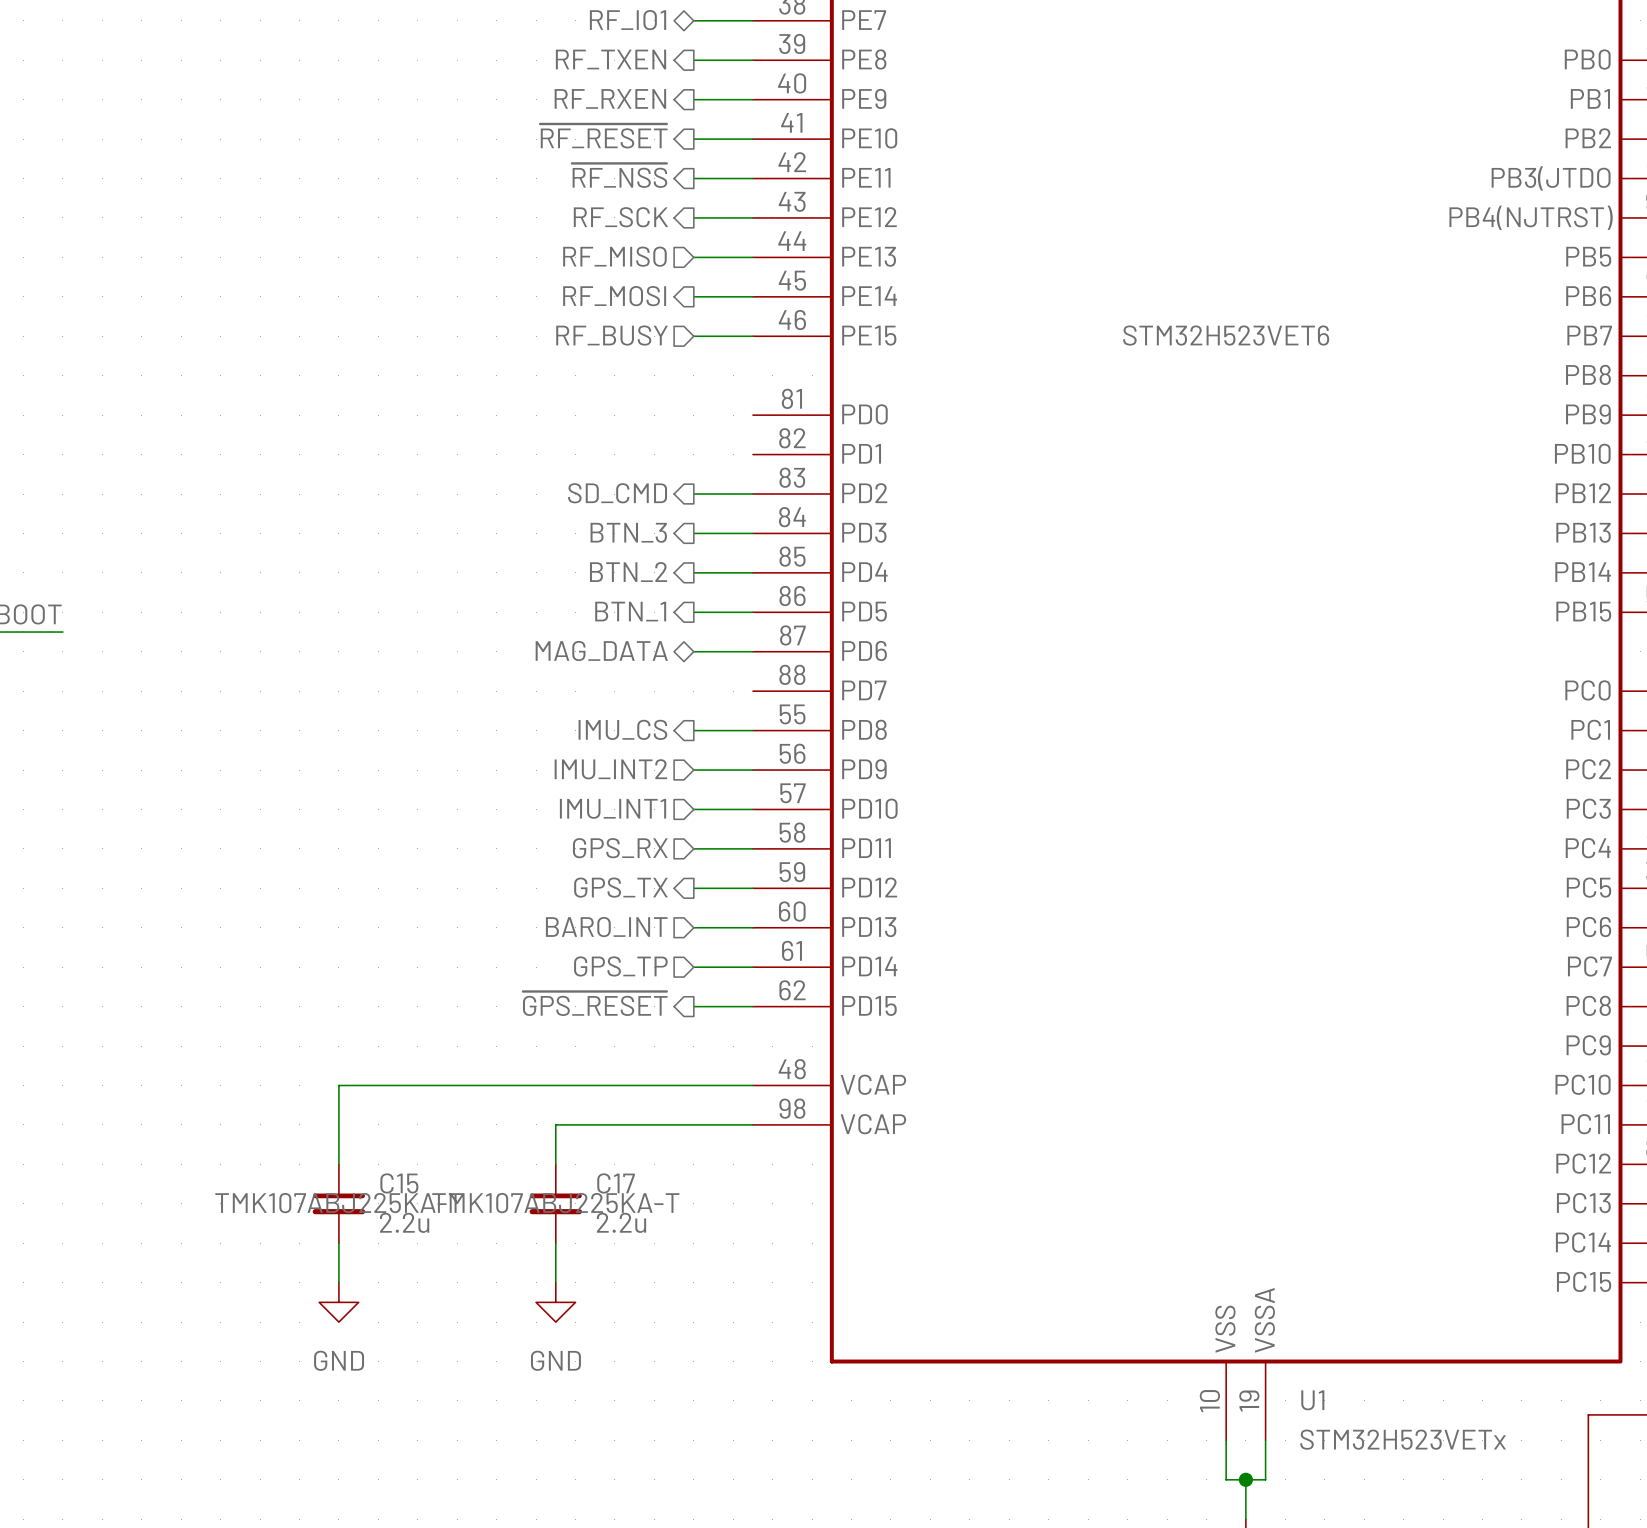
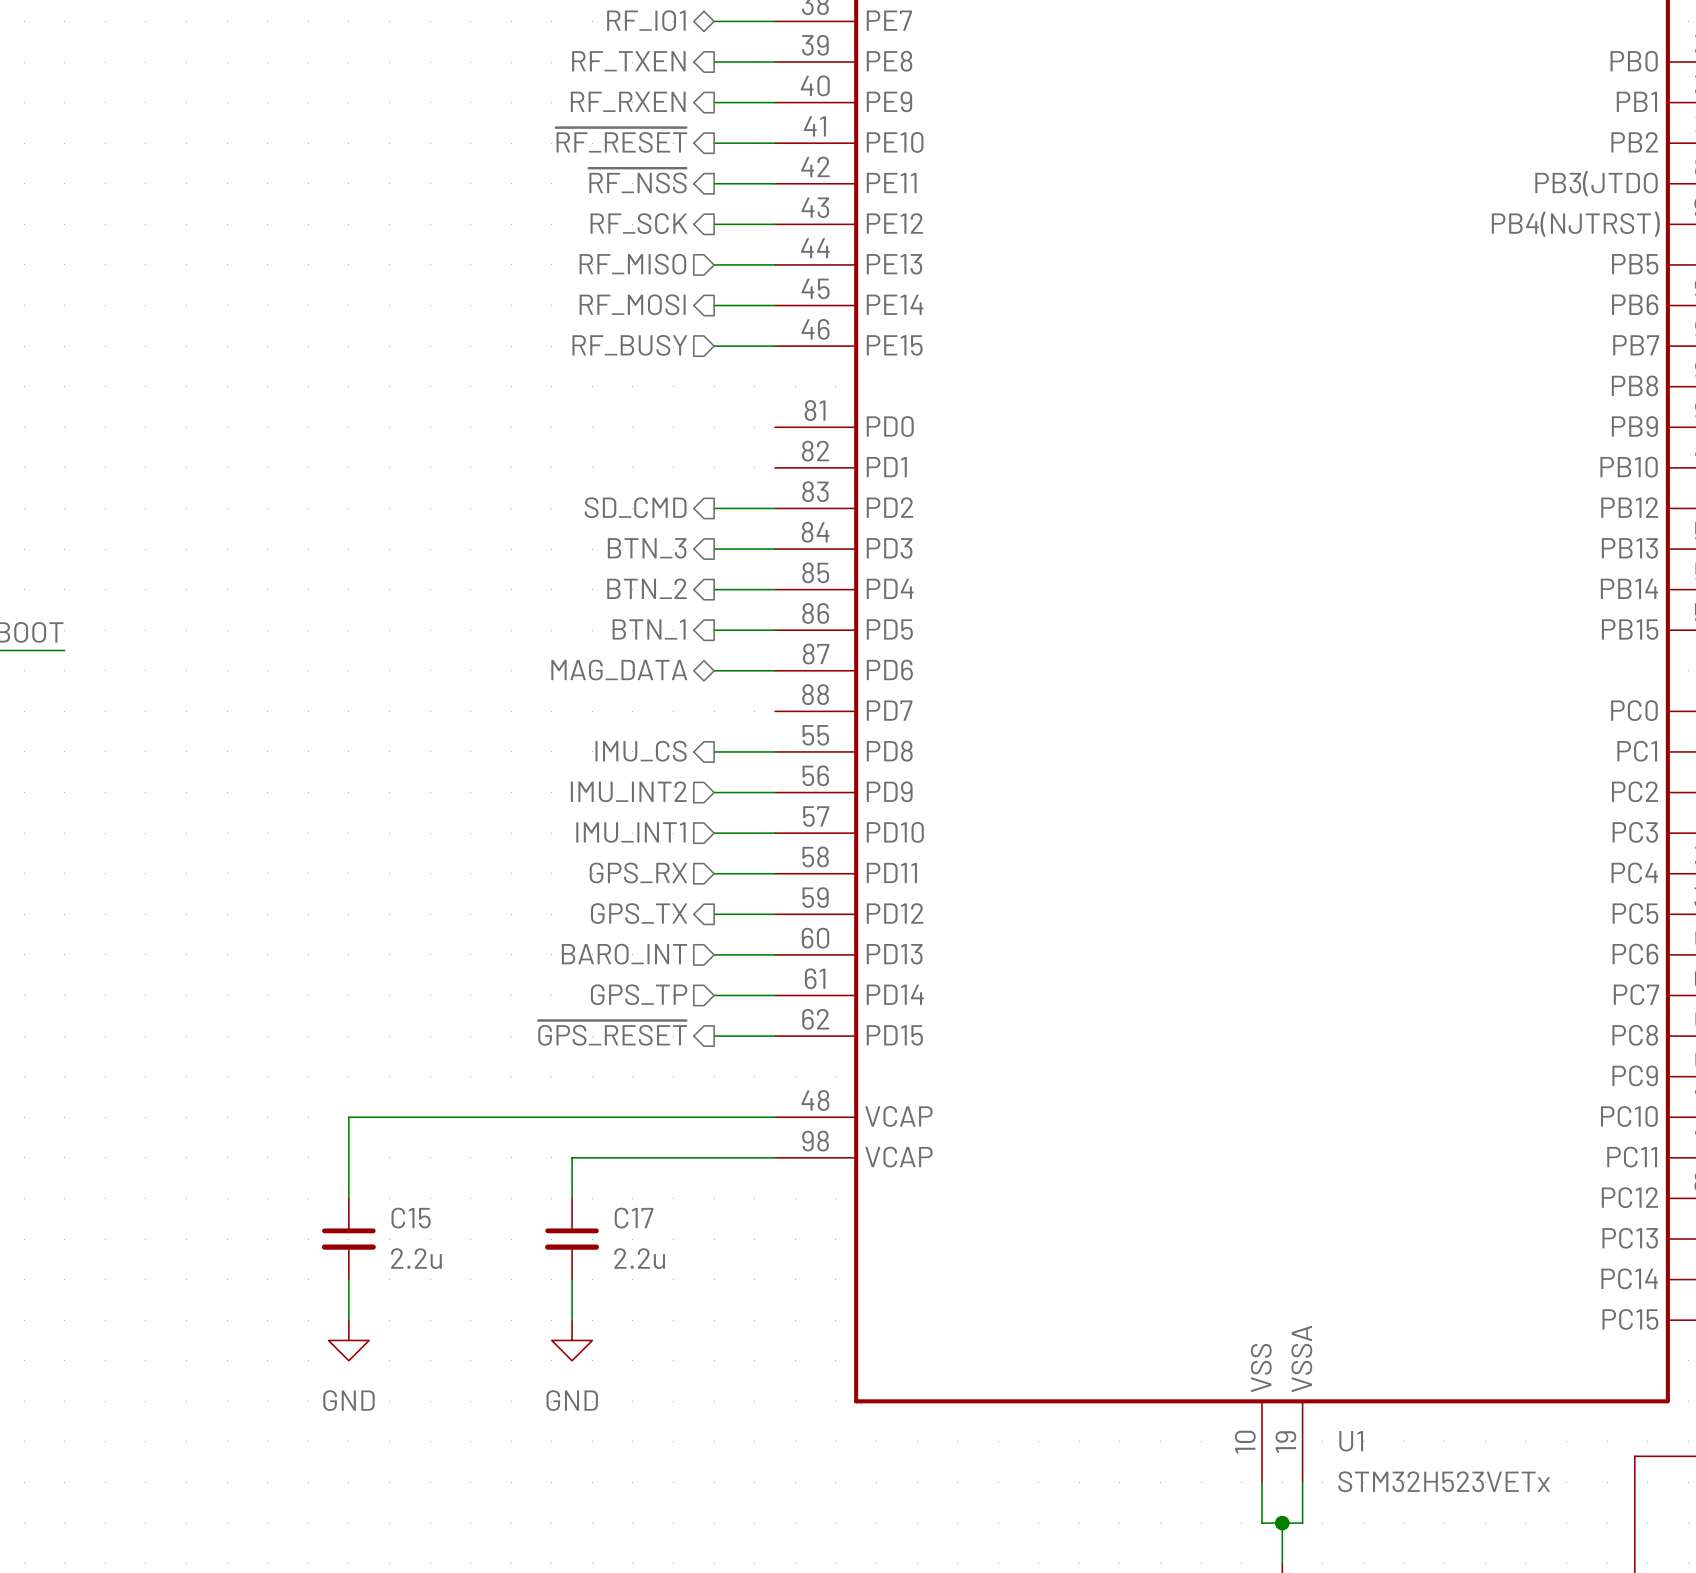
U1 text: STM32H523VET6 (1226, 335) -> none
C15 text: TMK107ABJ225KA-T (338, 1203) -> none
C17 text: TMK107ABJ225KA-T (555, 1203) -> none

